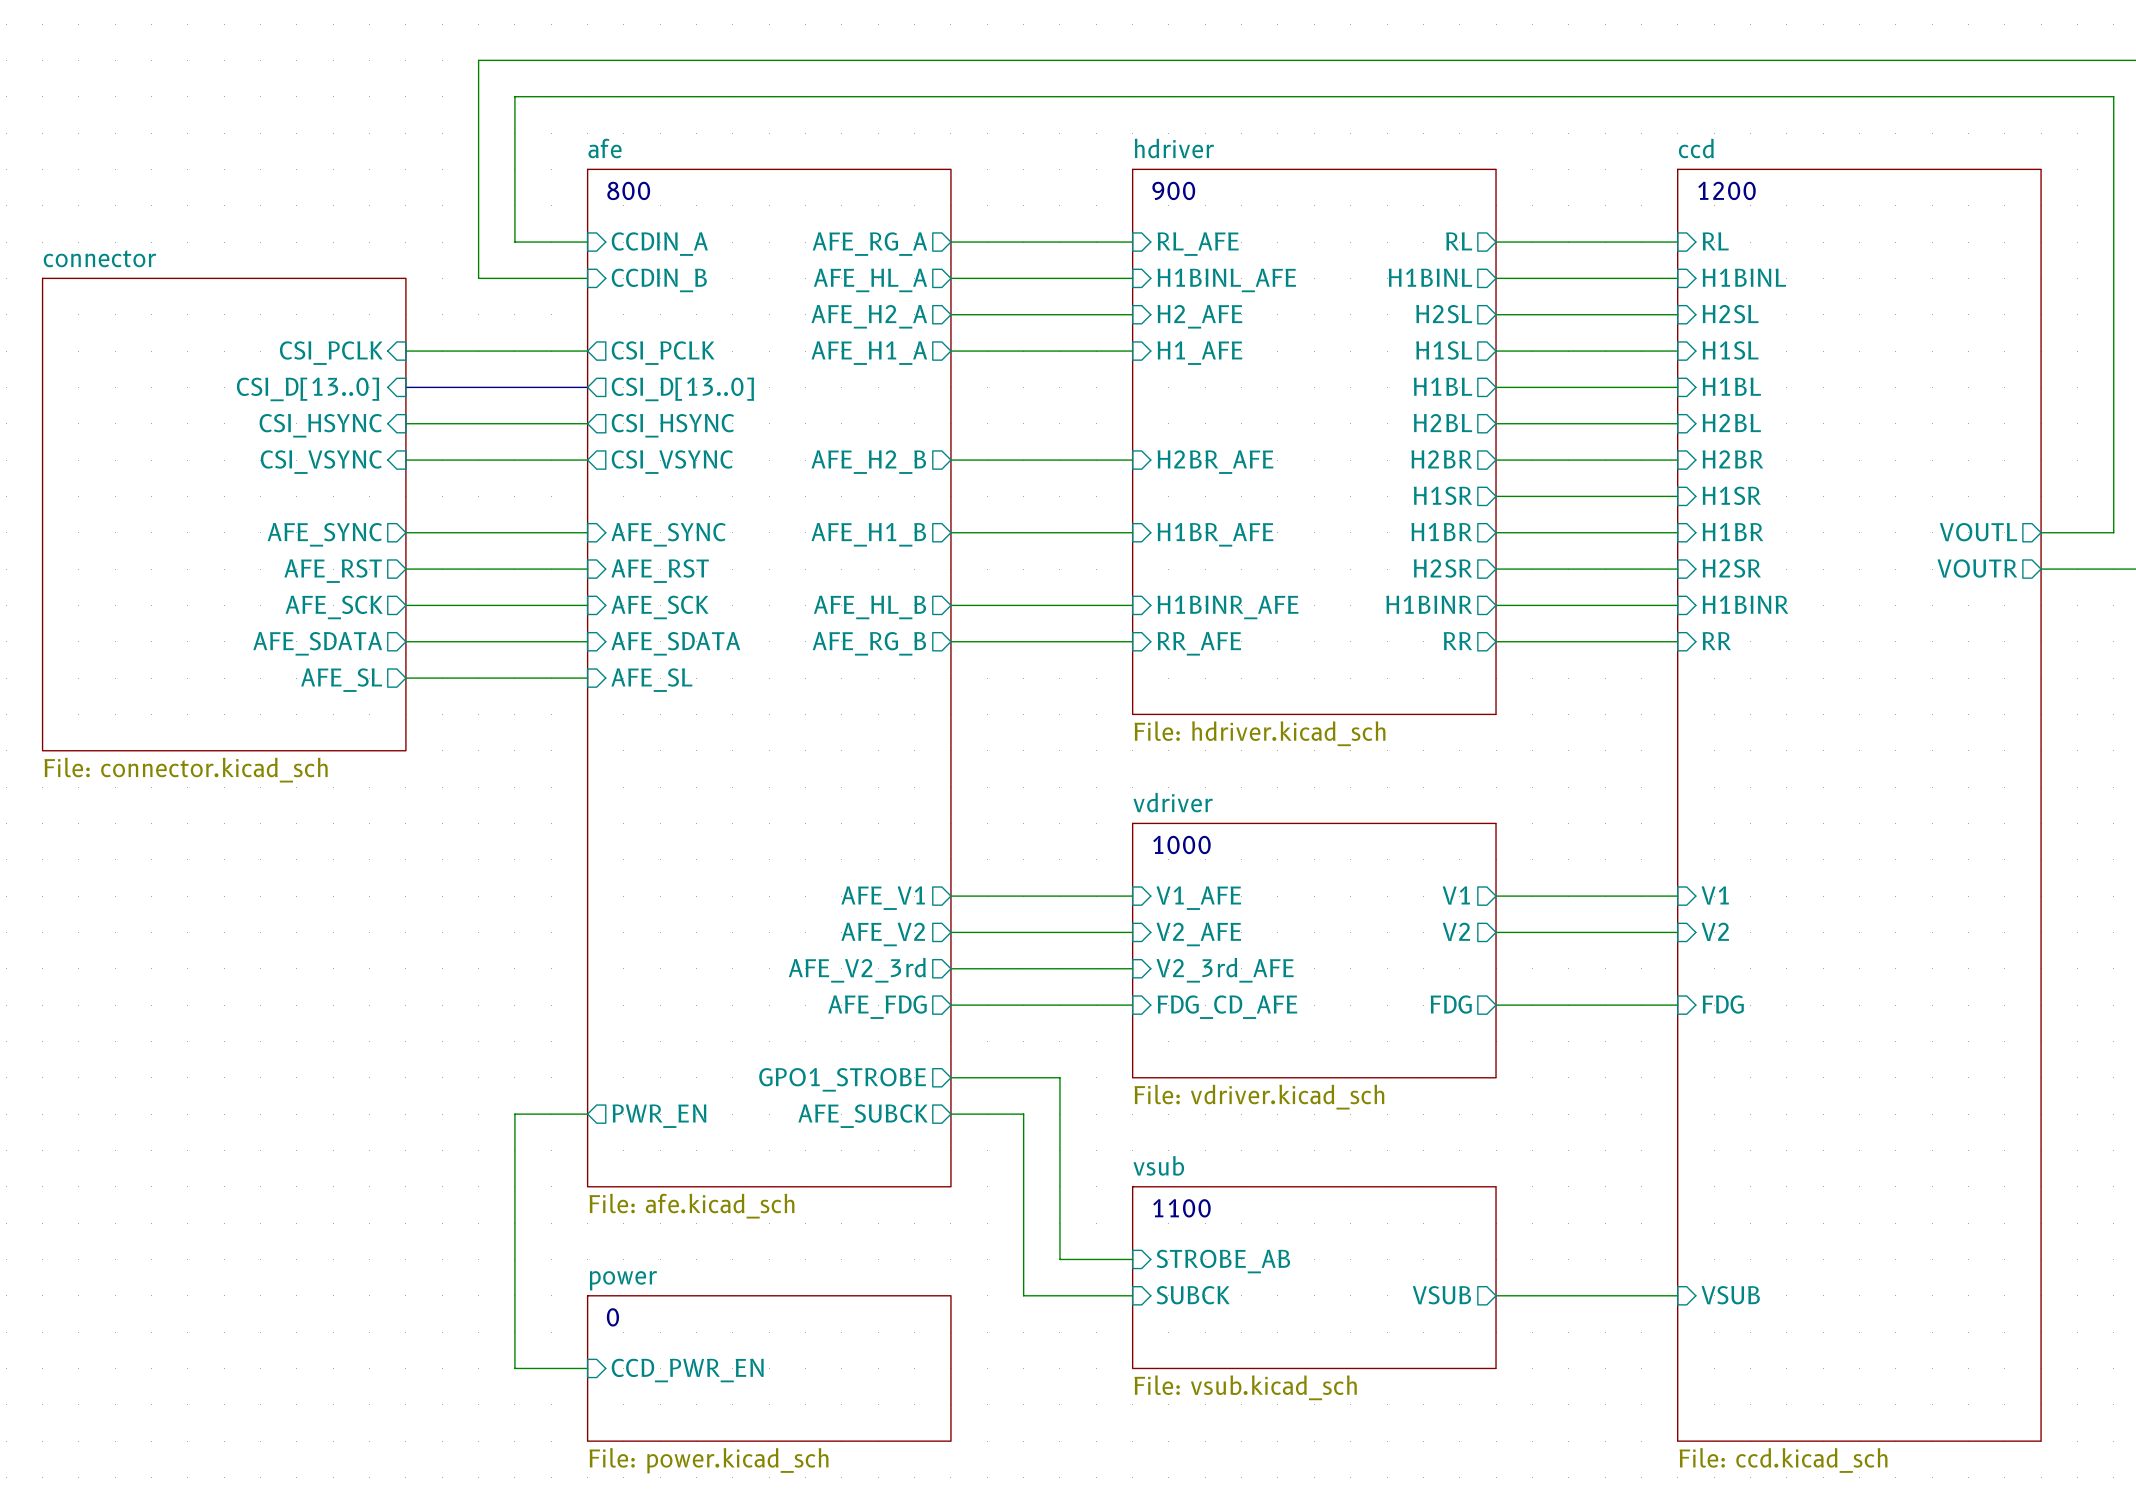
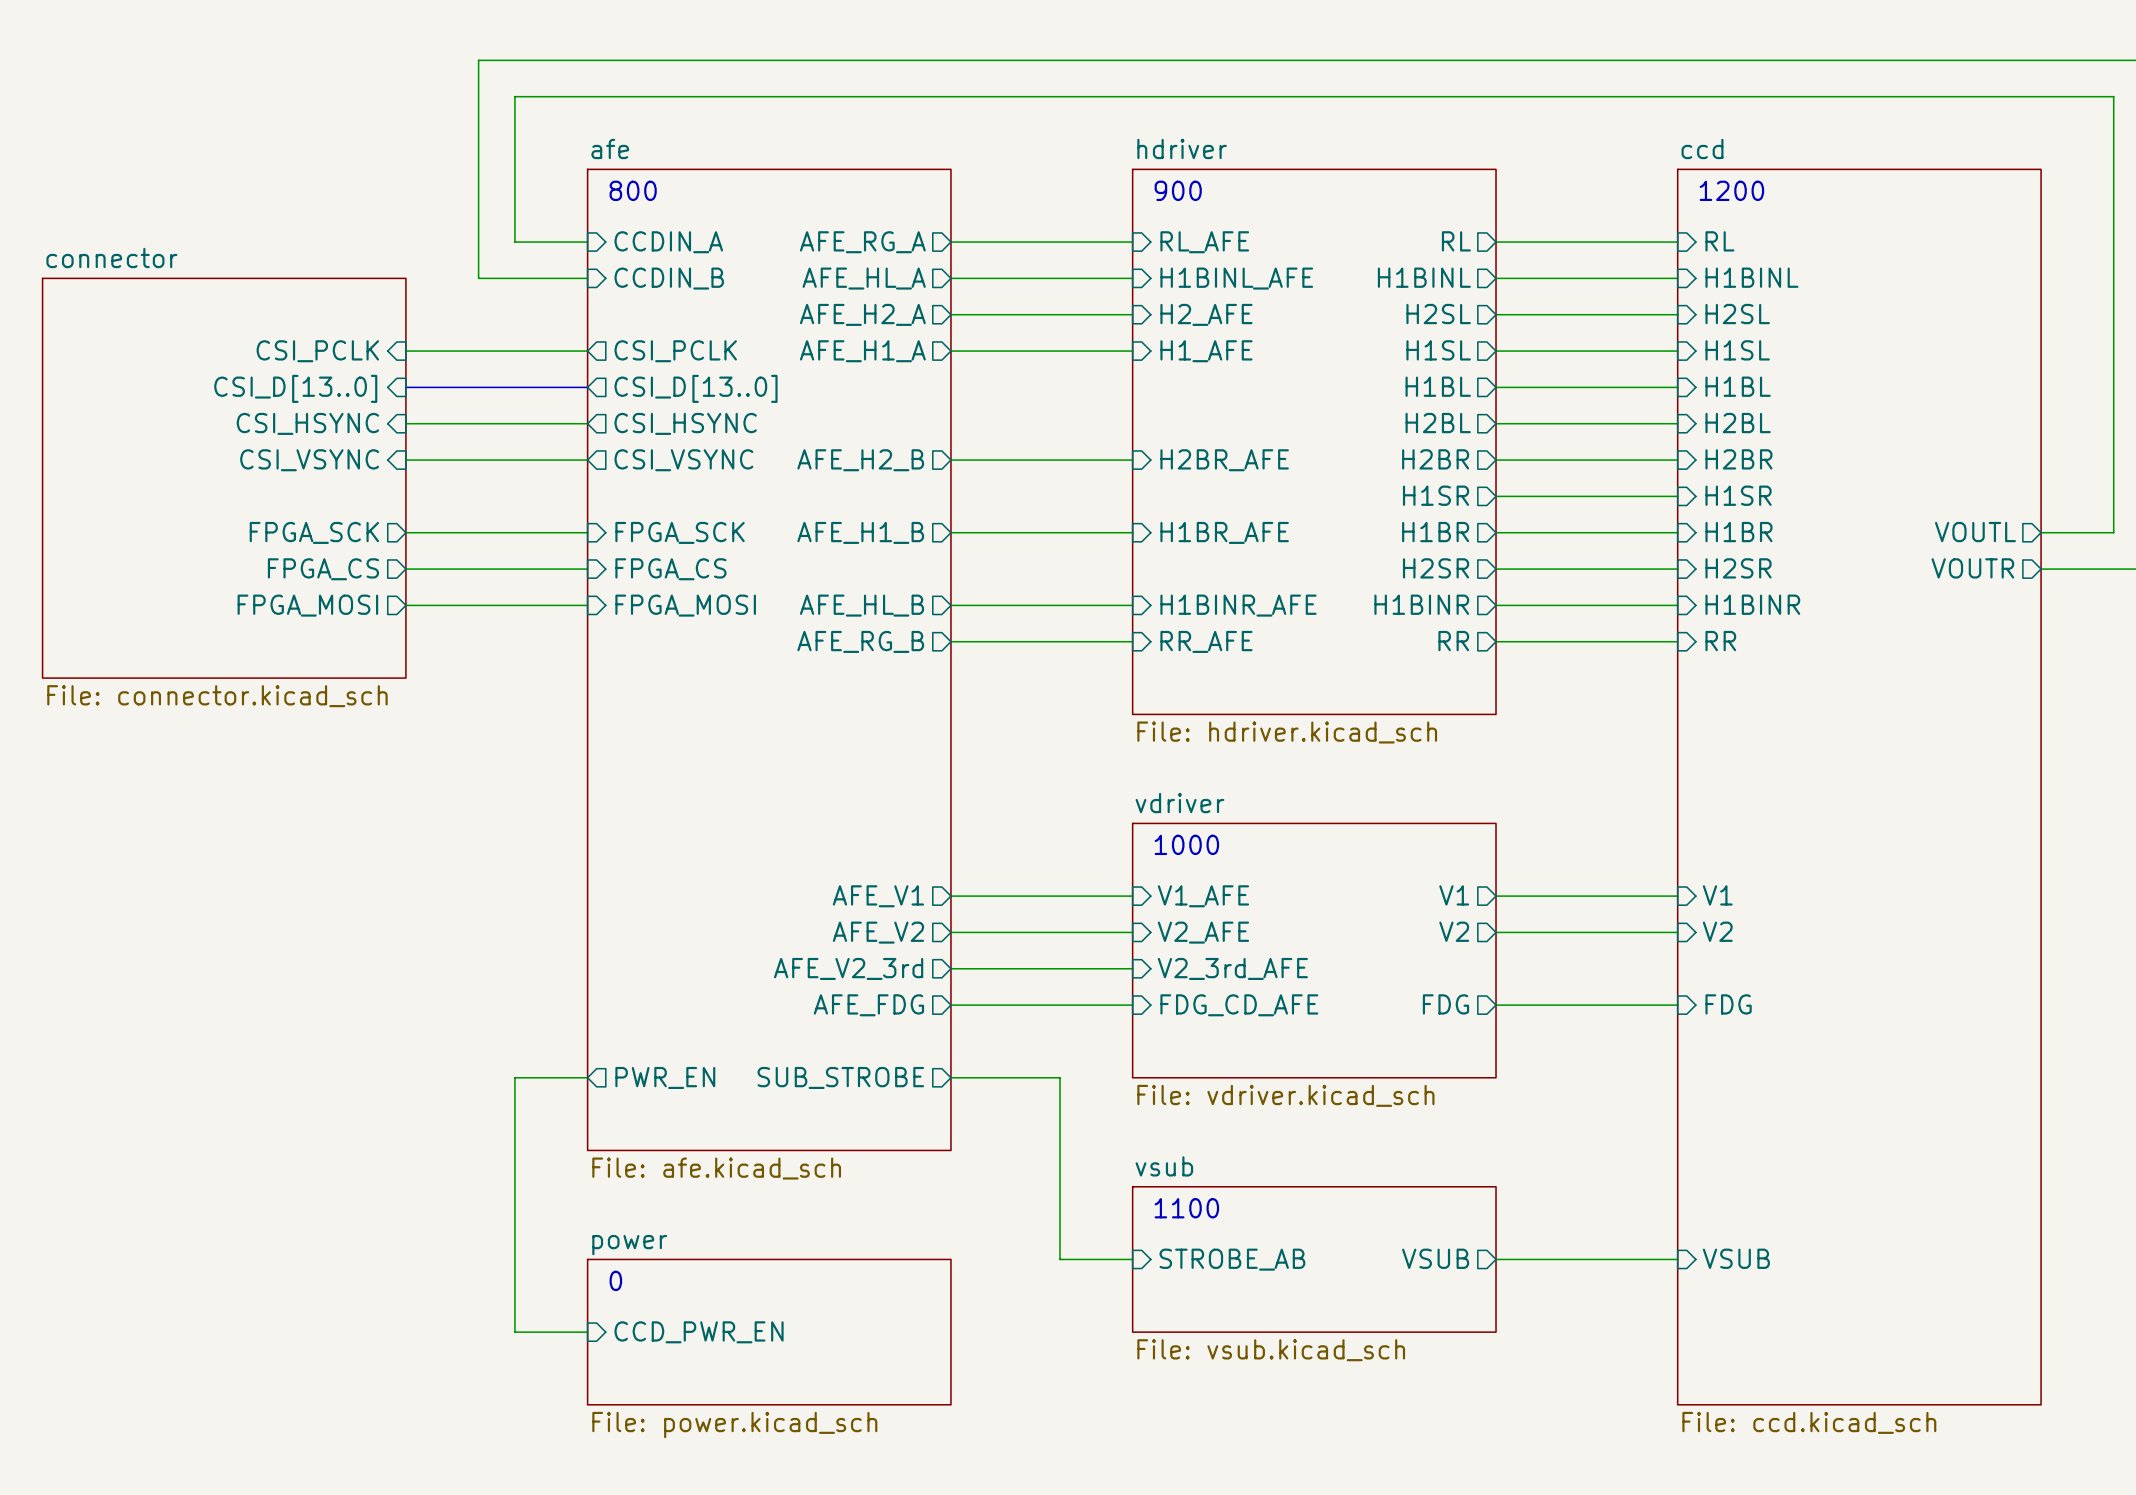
sheet connector: none -> File: connector.kicad_sch (224, 478)
sheet connector: File: connector.kicad_sch (224, 514) -> none
sheet pin: AFE_SYNC (324, 534) -> FPGA_SCK (314, 532)
sheet pin: AFE_SYNC (668, 534) -> FPGA_SCK (680, 532)
sheet pin: AFE_RST (333, 571) -> FPGA_CS (323, 569)
sheet pin: AFE_RST (660, 571) -> FPGA_CS (670, 569)
sheet pin: AFE_SCK (334, 607) -> FPGA_MOSI (307, 605)
sheet pin: AFE_SCK (660, 607) -> FPGA_MOSI (685, 605)
wire: (405, 641) (587, 641) -> none
sheet pin: AFE_SDATA (317, 643) -> none
sheet pin: AFE_SDATA (675, 643) -> none
sheet afe: none -> File: afe.kicad_sch (769, 659)
wire: (405, 678) (587, 678) -> none
sheet afe: File: afe.kicad_sch (769, 678) -> none
sheet pin: AFE_SL (341, 680) -> none
sheet pin: AFE_SL (651, 680) -> none
sheet ccd: none -> File: ccd.kicad_sch (1859, 787)
sheet ccd: File: ccd.kicad_sch (1859, 805) -> none
sheet pin: GPO1_STROBE (842, 1079) -> SUB_STROBE (840, 1077)
wire: (514, 1114) (587, 1114) -> (514, 1114) (514, 1077) (587, 1077)
wire: (950, 1114) (1023, 1114) (1023, 1295) (1132, 1295) -> none
sheet pin position: PWR_EN (659, 1116) -> PWR_EN (665, 1077)
sheet pin: AFE_SUBCK (863, 1116) -> none
sheet vsub: none -> File: vsub.kicad_sch (1314, 1259)
sheet vsub: File: vsub.kicad_sch (1314, 1277) -> none
sheet pin: SUBCK (1193, 1295) -> none
sheet pin position: VSUB (1441, 1295) -> VSUB (1435, 1258)
wire: (1496, 1295) (1677, 1295) -> (1496, 1259) (1677, 1259)
sheet pin position: VSUB (1730, 1295) -> VSUB (1736, 1258)
text position: 0 (612, 1317) -> 0 (615, 1280)
wire: (514, 1332) (514, 1368) (587, 1368) -> (514, 1332) (587, 1332)
sheet power position: (769, 1368) -> (769, 1332)
sheet pin position: CCD_PWR_EN (687, 1370) -> CCD_PWR_EN (699, 1332)

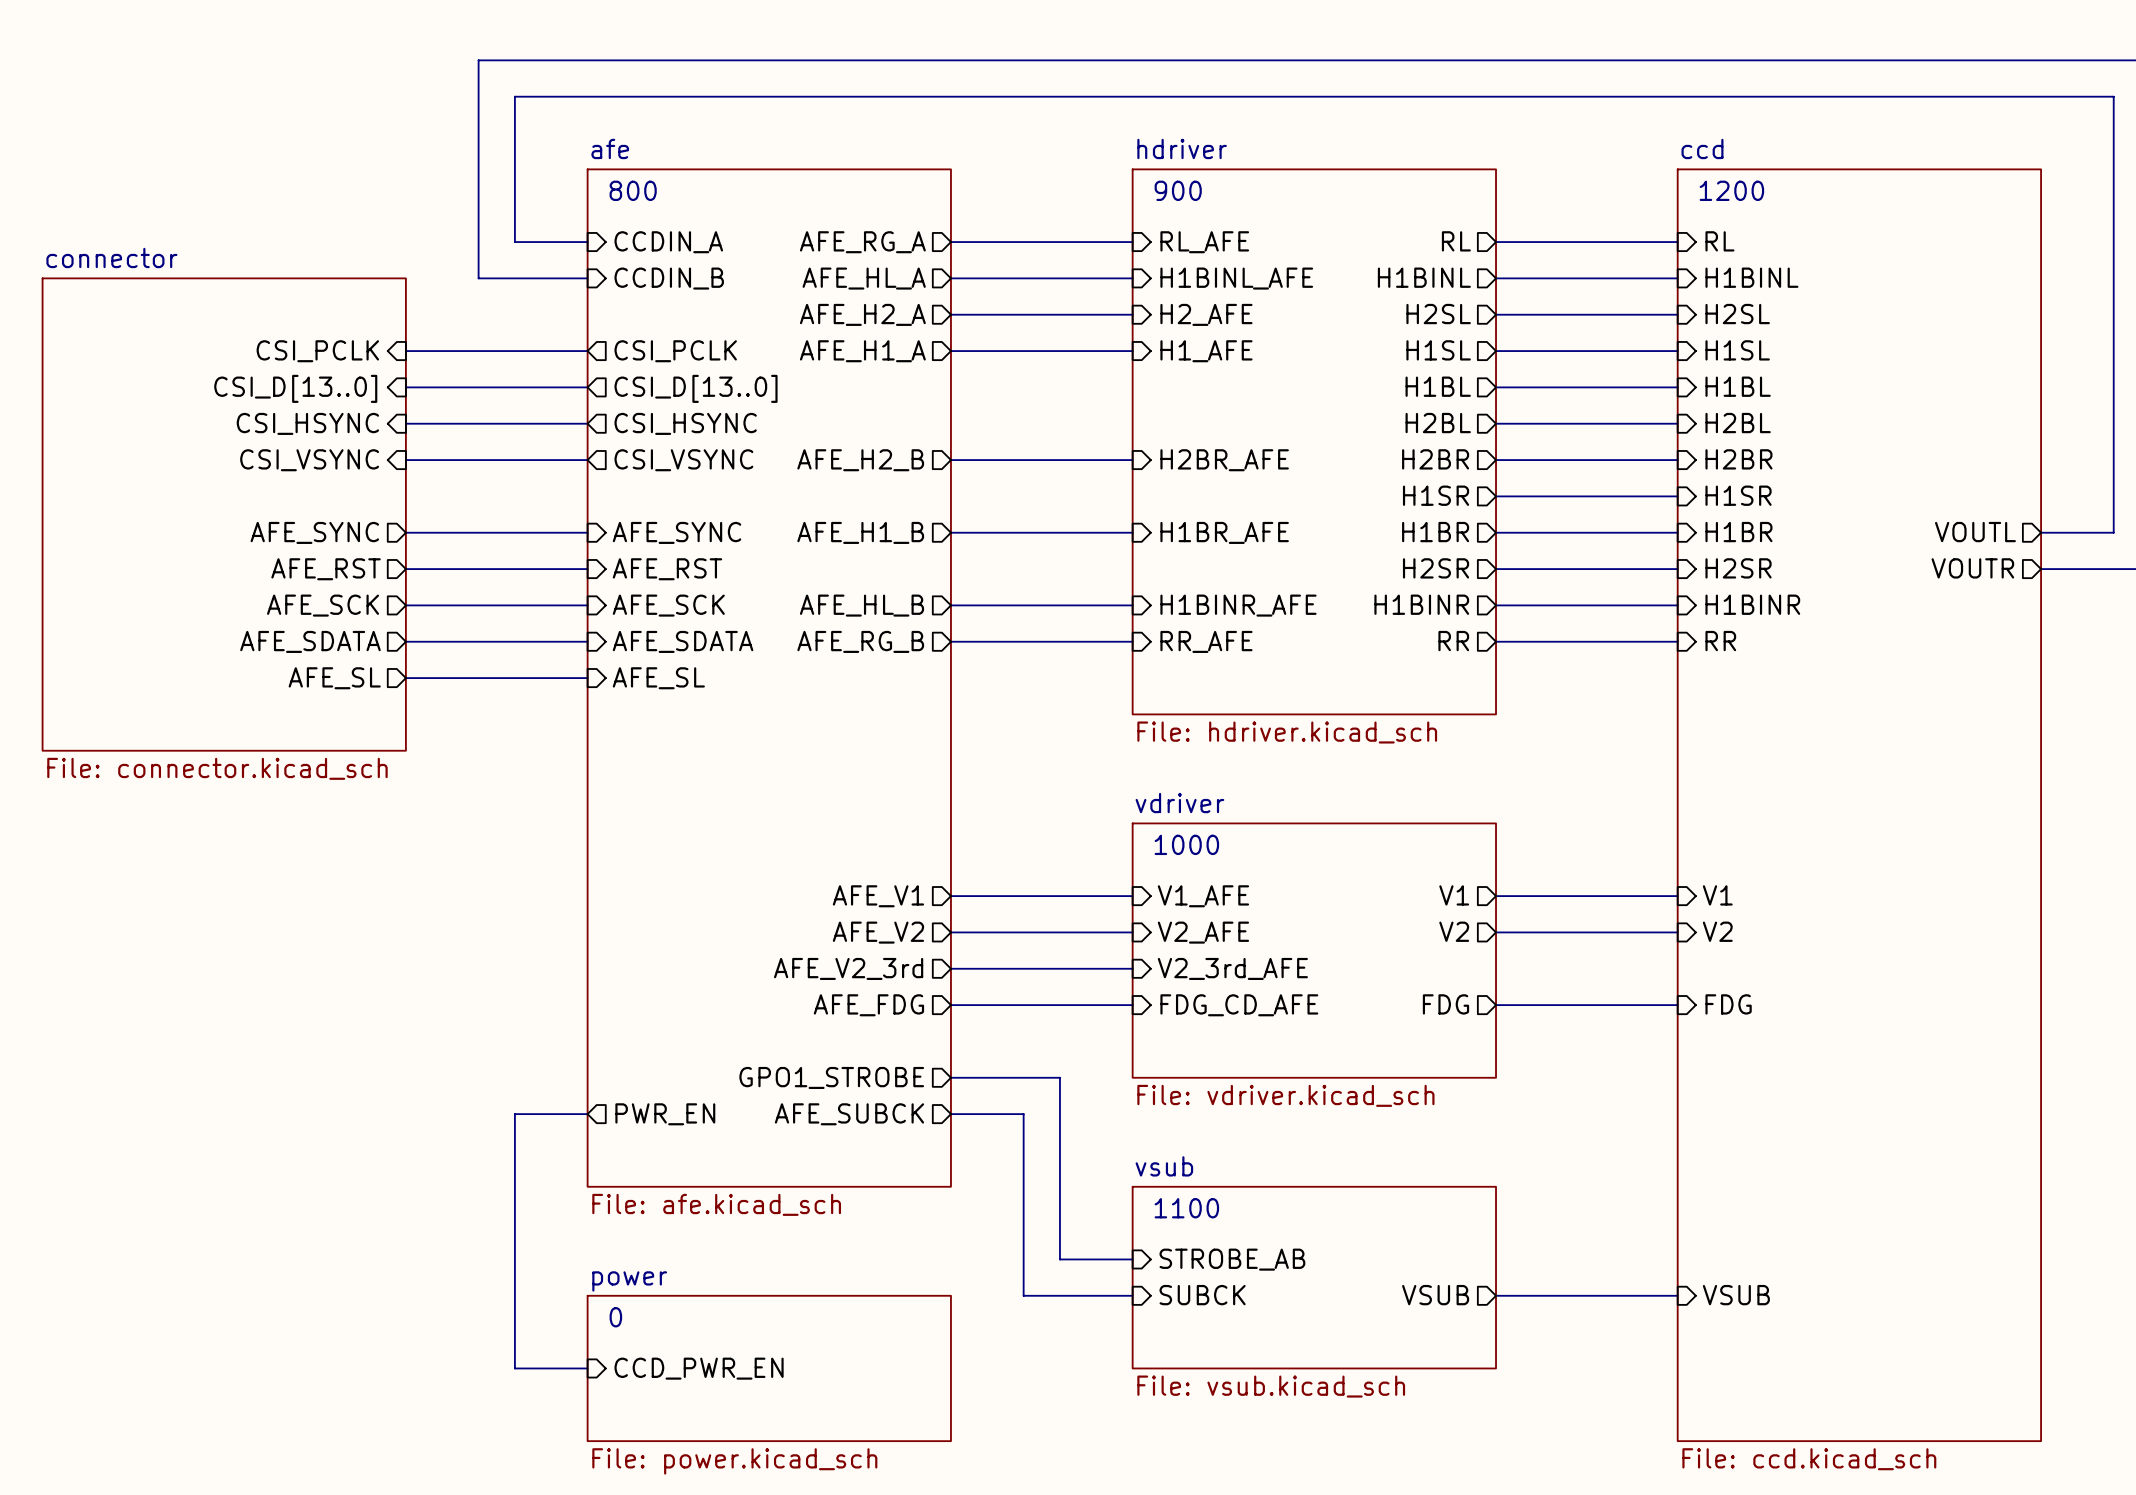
sheet connector: File: connector.kicad_sch (224, 478) -> none
sheet connector: none -> File: connector.kicad_sch (224, 514)
sheet pin: FPGA_SCK (314, 532) -> AFE_SYNC (314, 532)
sheet pin: FPGA_SCK (680, 532) -> AFE_SYNC (677, 532)
sheet pin: FPGA_CS (323, 569) -> AFE_RST (326, 569)
sheet pin: FPGA_CS (670, 569) -> AFE_RST (667, 569)
sheet pin: FPGA_MOSI (307, 605) -> AFE_SCK (323, 605)
sheet pin: FPGA_MOSI (685, 605) -> AFE_SCK (668, 605)
sheet pin: none -> AFE_SDATA (310, 641)
wire: none -> (405, 641) (587, 641)
sheet pin: none -> AFE_SDATA (683, 641)
sheet afe: File: afe.kicad_sch (769, 659) -> none
sheet pin: none -> AFE_SL (334, 678)
wire: none -> (405, 678) (587, 678)
sheet pin: none -> AFE_SL (658, 678)
sheet afe: none -> File: afe.kicad_sch (769, 678)
sheet ccd: File: ccd.kicad_sch (1859, 787) -> none
sheet ccd: none -> File: ccd.kicad_sch (1859, 805)
wire: (587, 1077) (514, 1077) (514, 1114) -> (587, 1114) (514, 1114)
sheet pin position: PWR_EN (665, 1077) -> PWR_EN (665, 1114)
sheet pin: SUB_STROBE (840, 1077) -> GPO1_STROBE (831, 1077)
sheet pin: none -> AFE_SUBCK (849, 1114)
wire: none -> (950, 1114) (1023, 1114) (1023, 1295) (1132, 1295)
sheet pin position: VSUB (1435, 1258) -> VSUB (1435, 1295)
sheet pin position: VSUB (1736, 1258) -> VSUB (1736, 1295)
sheet vsub: File: vsub.kicad_sch (1314, 1259) -> none
wire: (1496, 1259) (1677, 1259) -> (1496, 1295) (1677, 1295)
sheet vsub: none -> File: vsub.kicad_sch (1314, 1277)
text position: 0 (615, 1280) -> 0 (615, 1317)
sheet pin: none -> SUBCK (1202, 1295)
wire: (514, 1332) (587, 1332) -> (514, 1332) (514, 1368) (587, 1368)
sheet pin position: CCD_PWR_EN (699, 1332) -> CCD_PWR_EN (699, 1368)
sheet power position: (769, 1332) -> (769, 1368)

